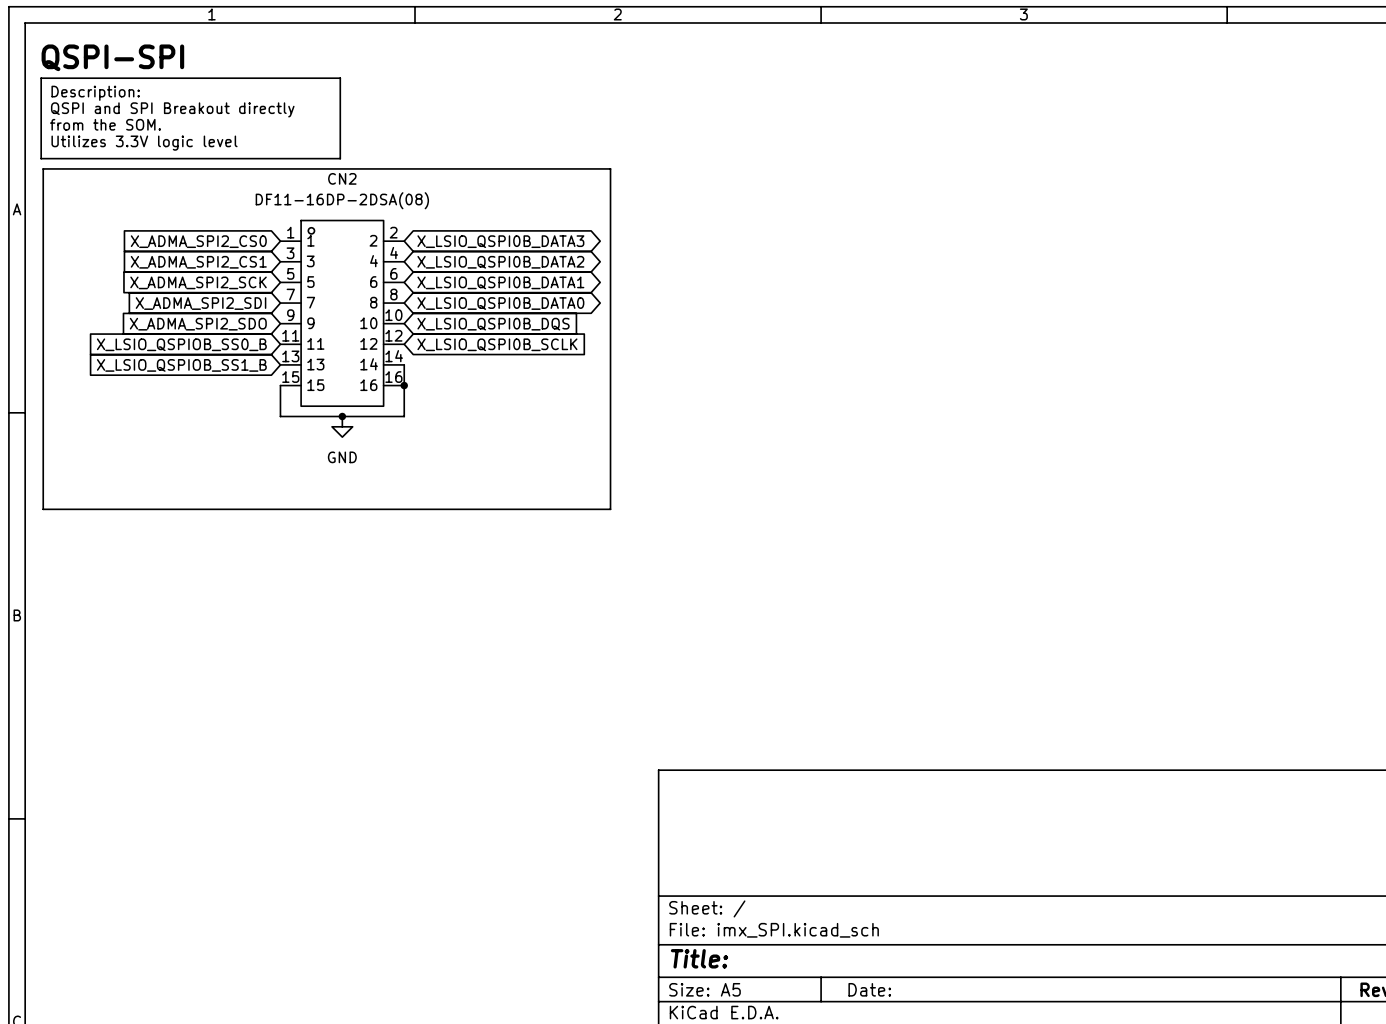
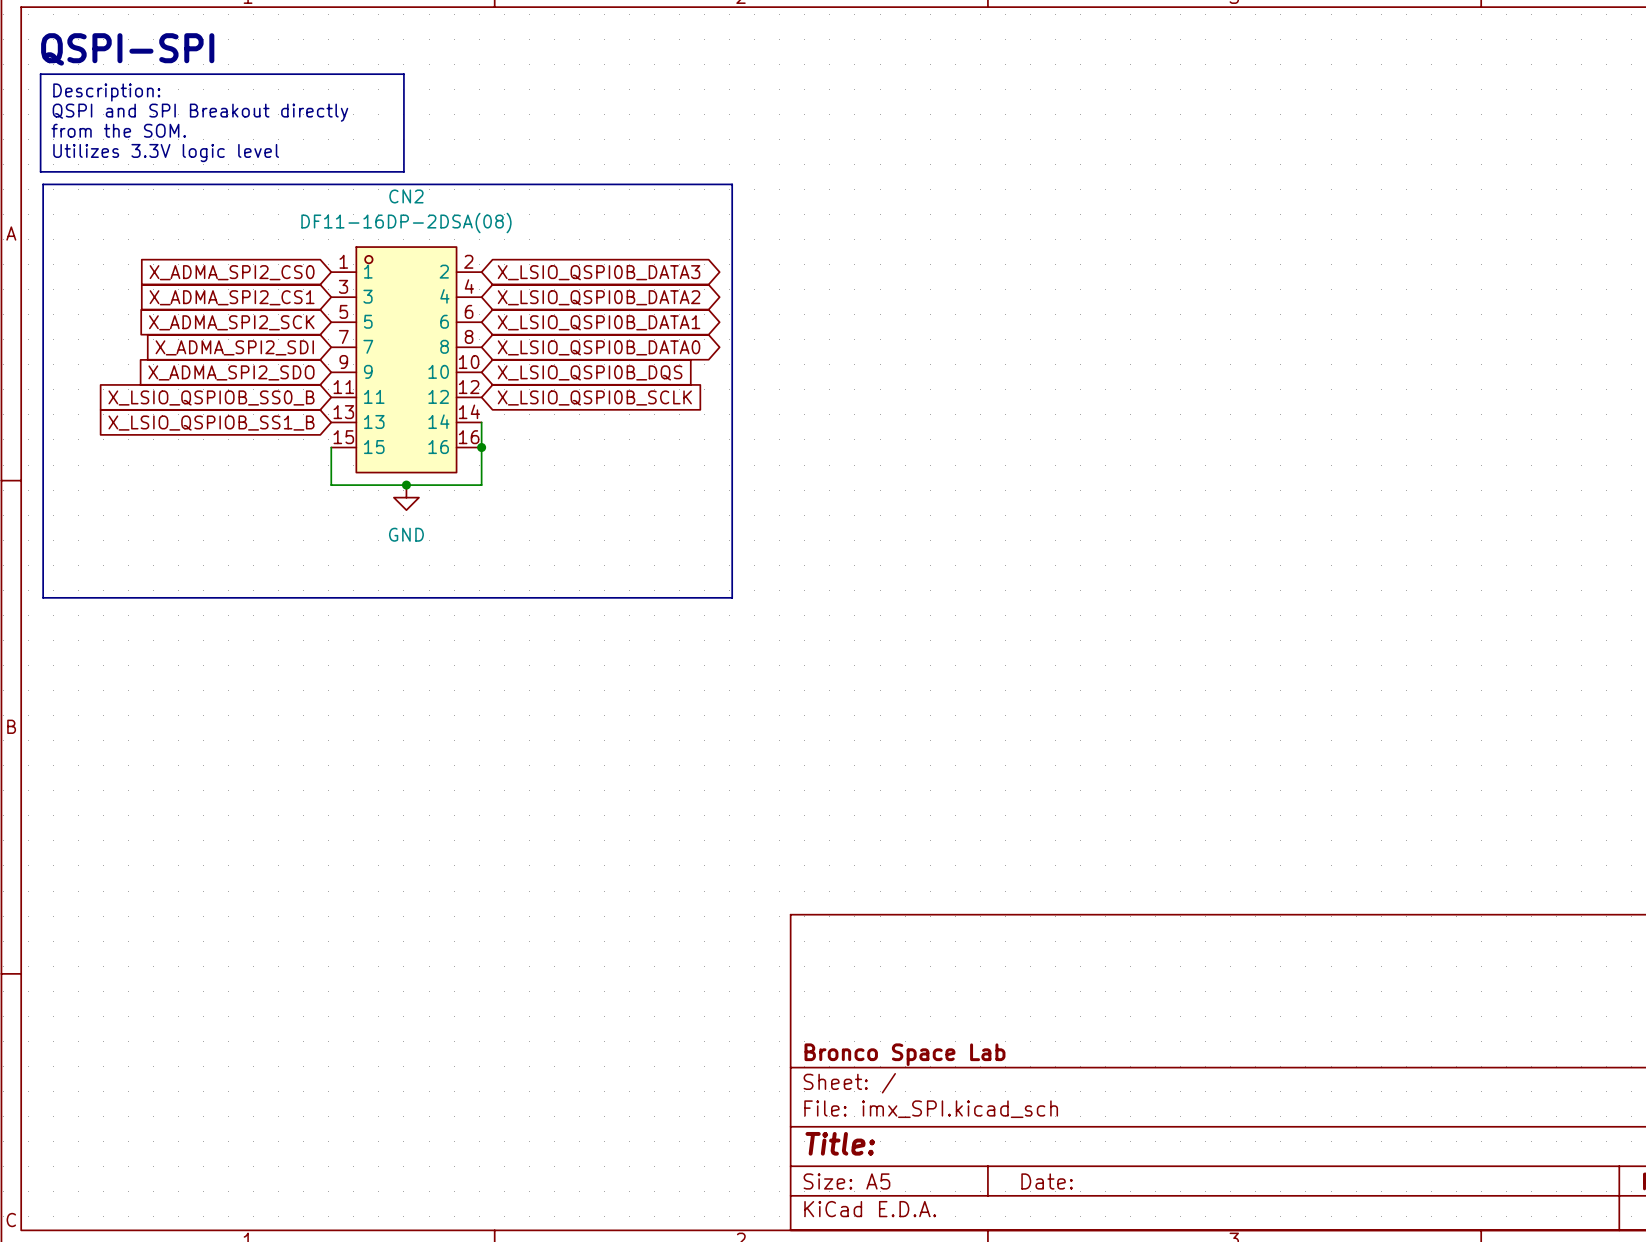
title block: none -> Bronco Space Lab (904, 1054)

